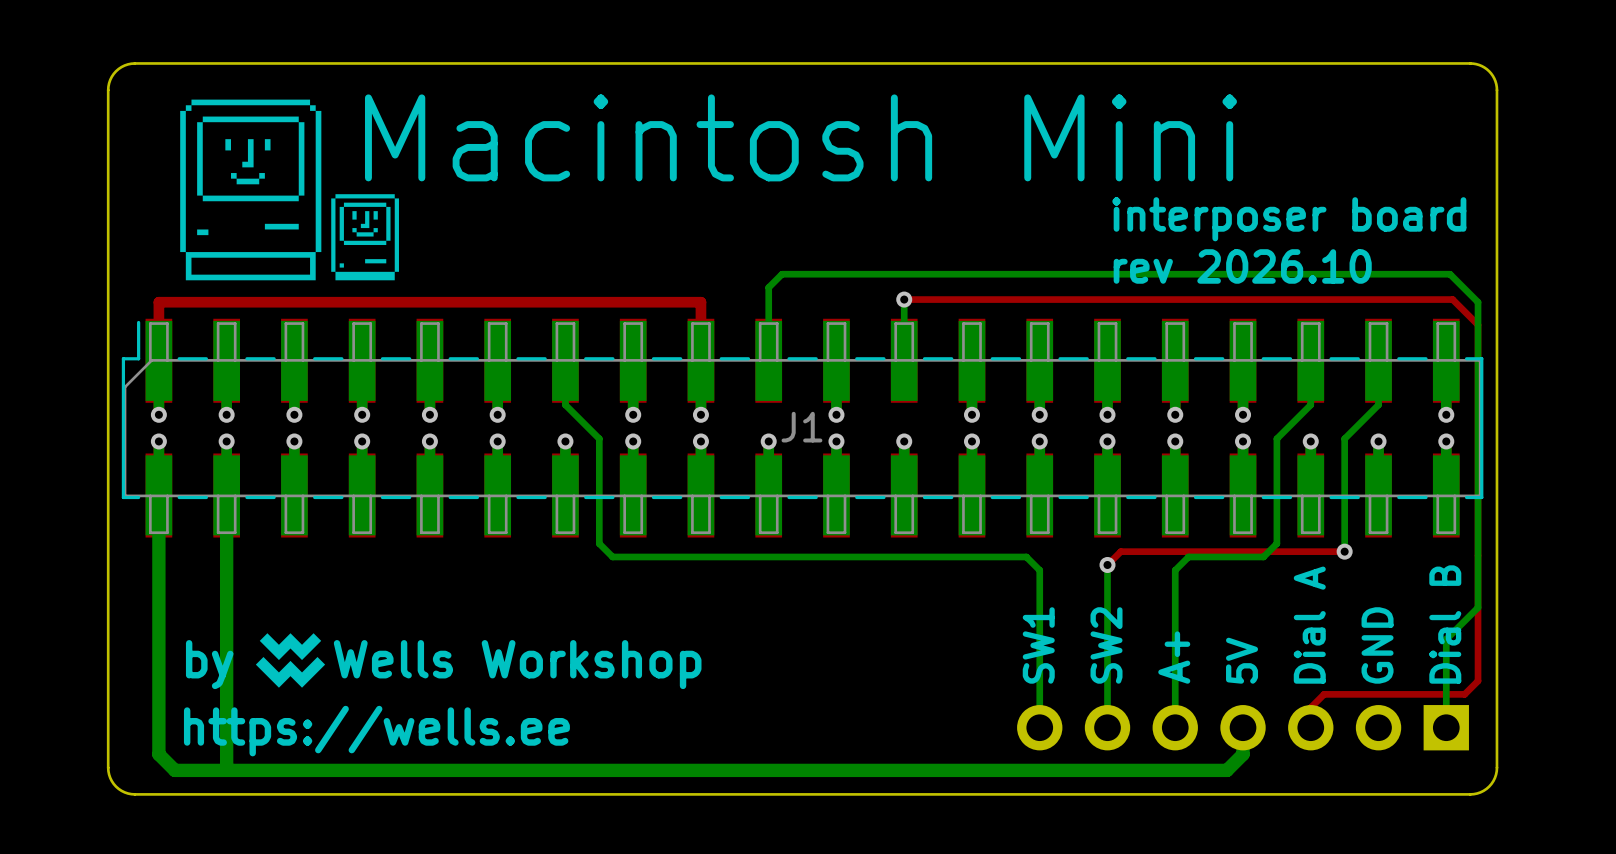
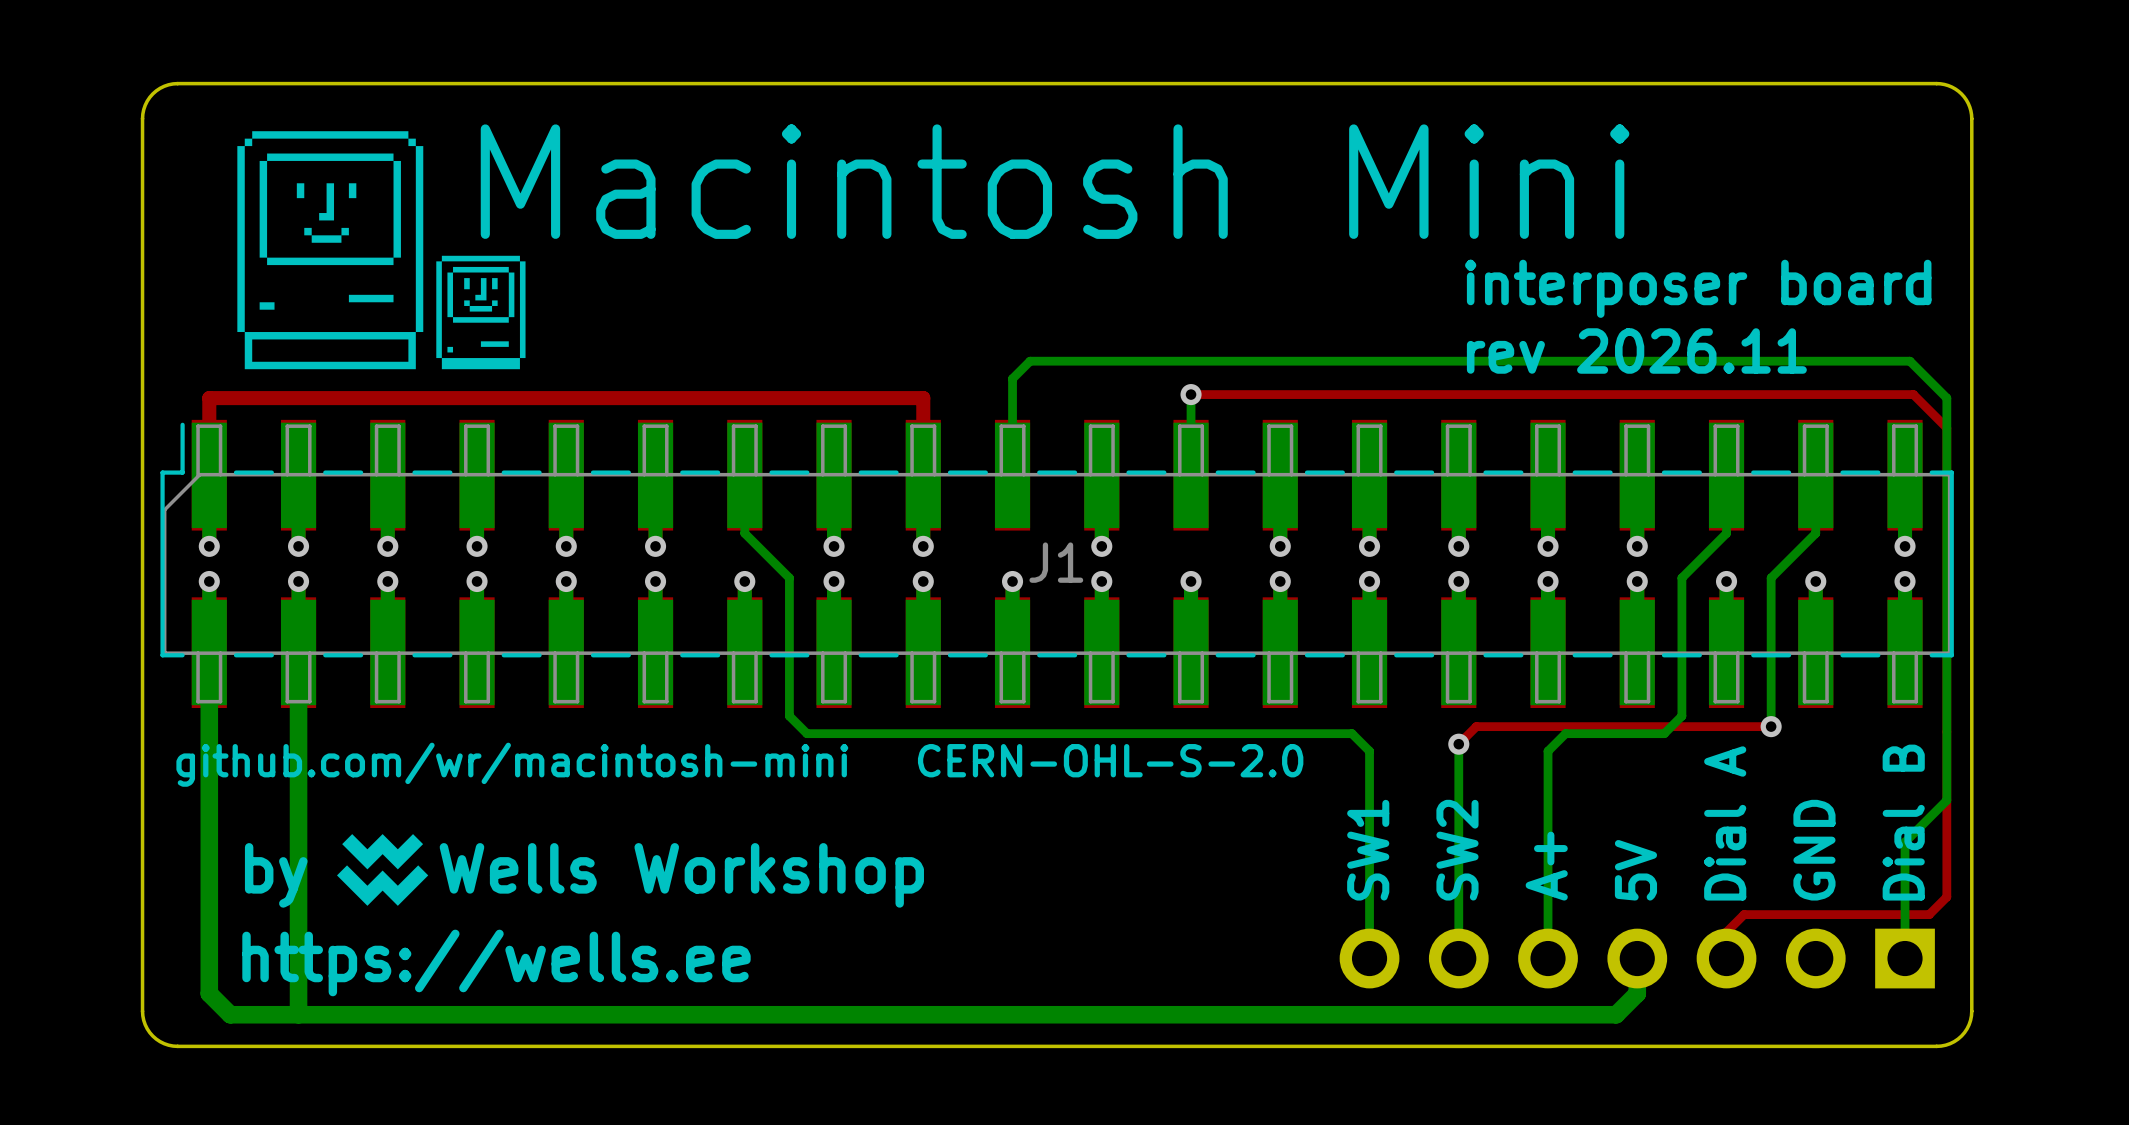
text: rev 2026.10 (1242, 266) -> rev 2026.11 (1636, 350)
text: none -> github.com/wr/macintosh-mini CERN-OHL-S-2.0 (739, 764)

